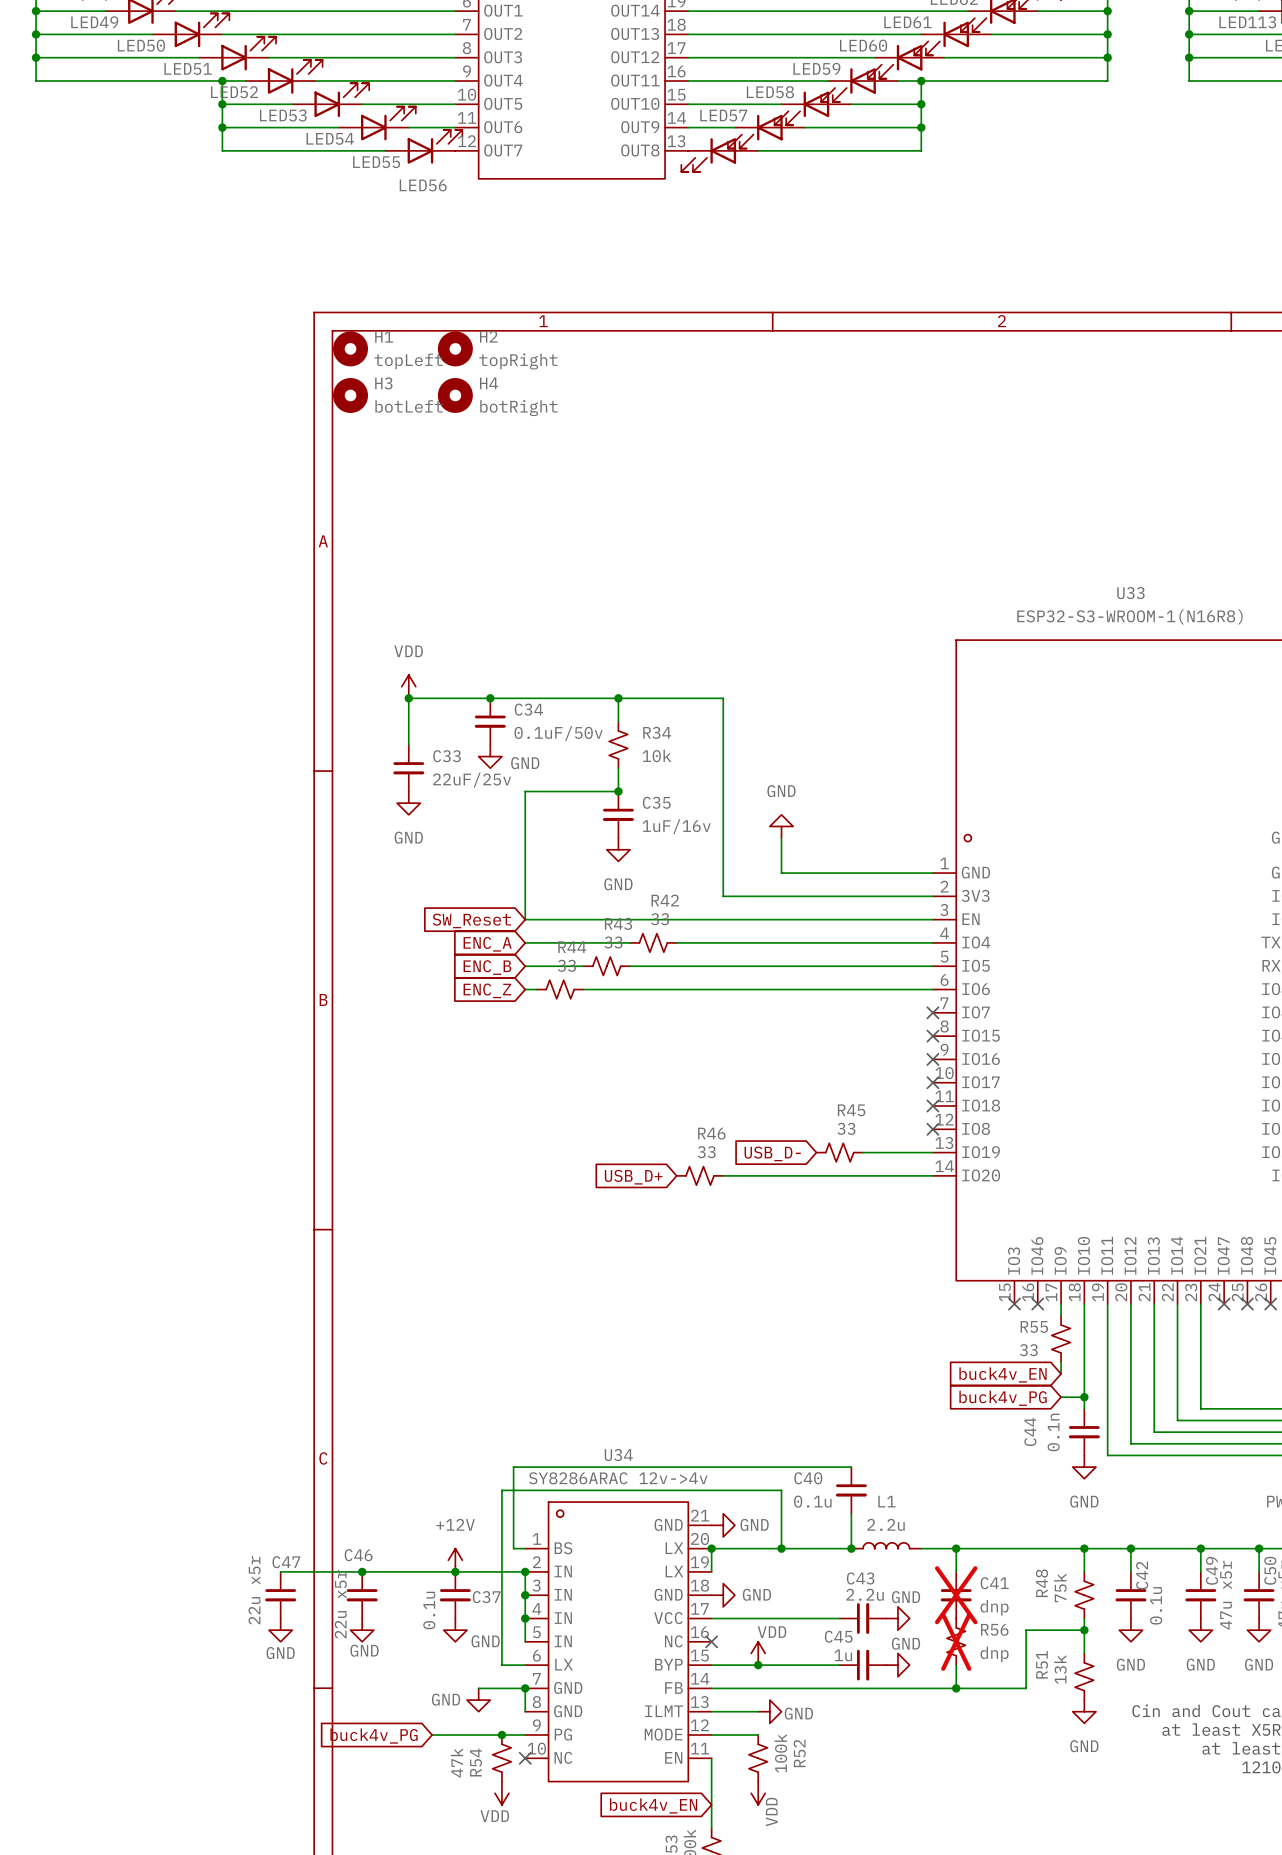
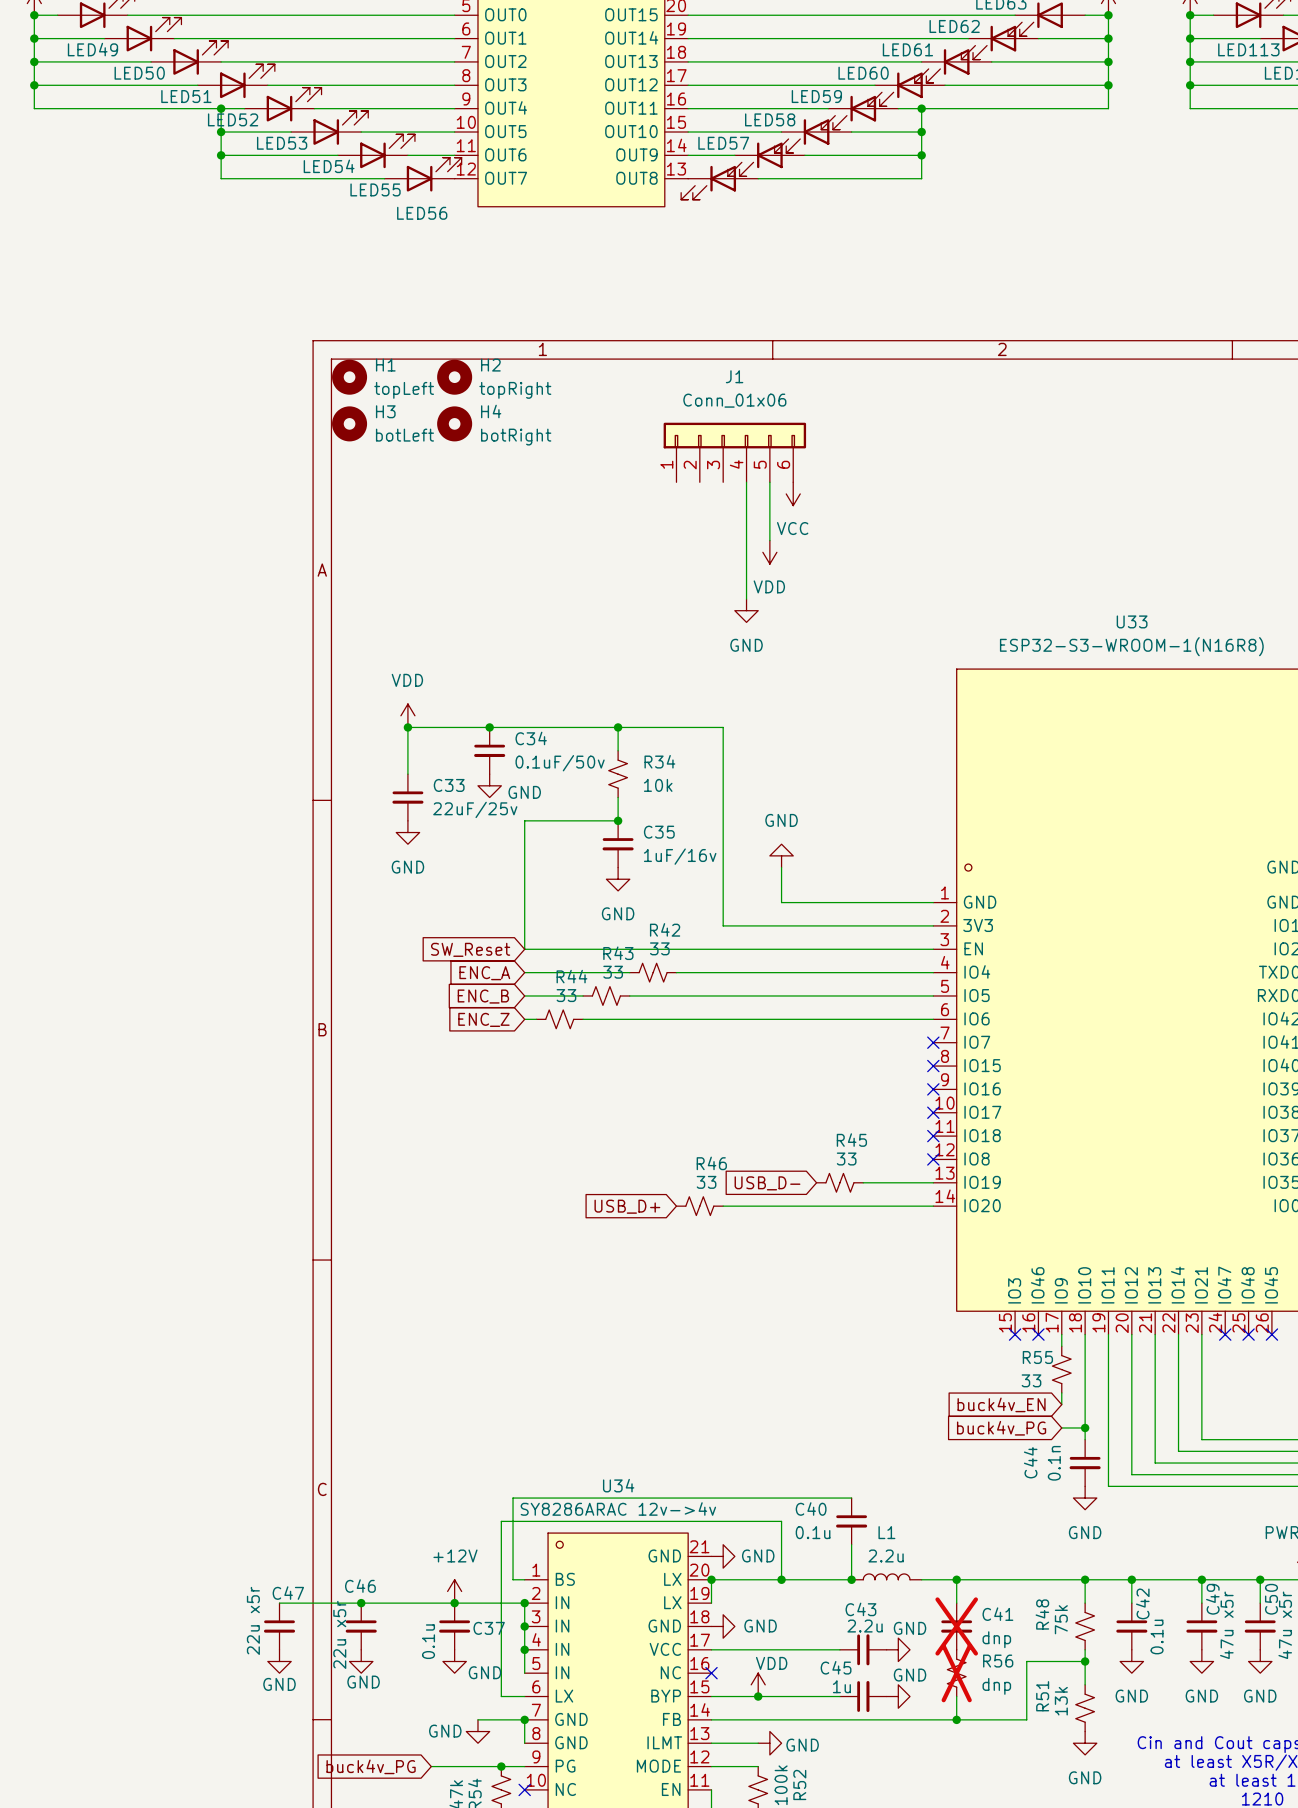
J1: none -> Conn_01x06 (734, 452)
wire: none -> (746, 482) (746, 599)
wire: none -> (769, 482) (769, 540)
power symbol: none -> VCC (793, 493)
power symbol: none -> VDD (769, 552)
power symbol: none -> GND (746, 610)

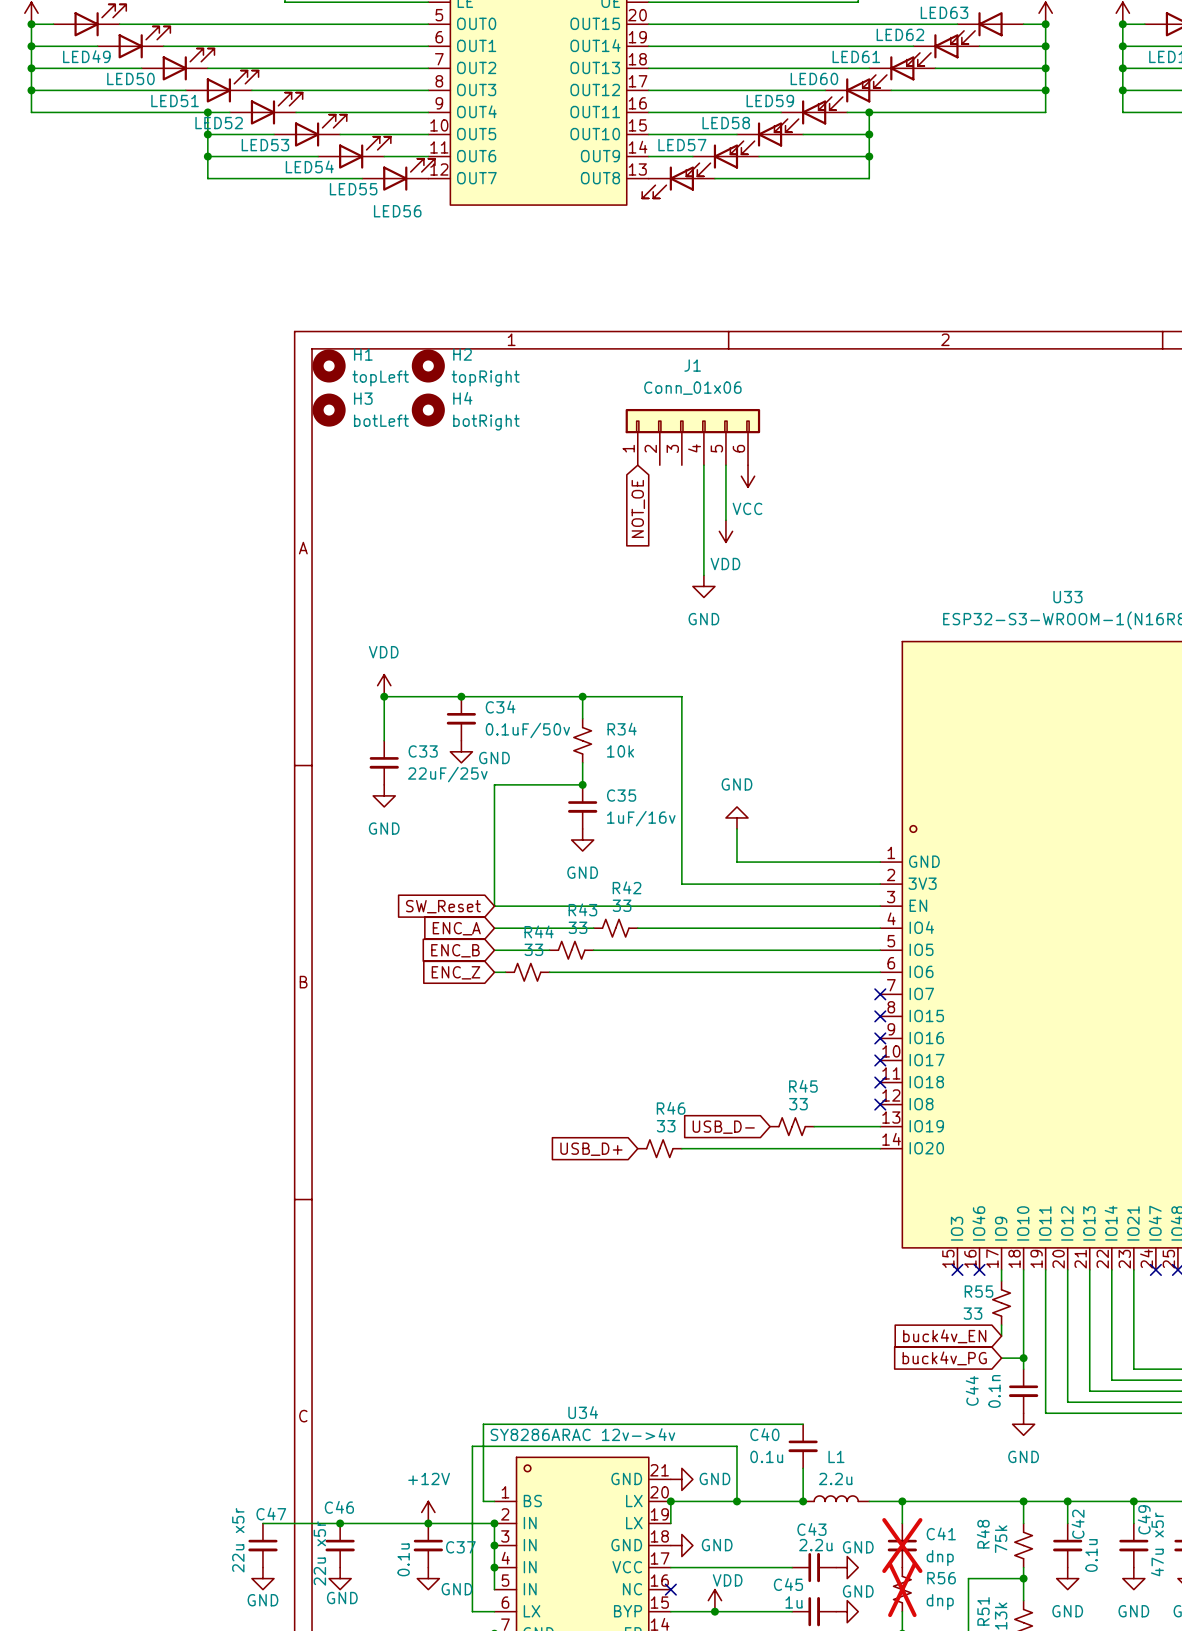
global label: none -> NOT_OE (638, 508)

